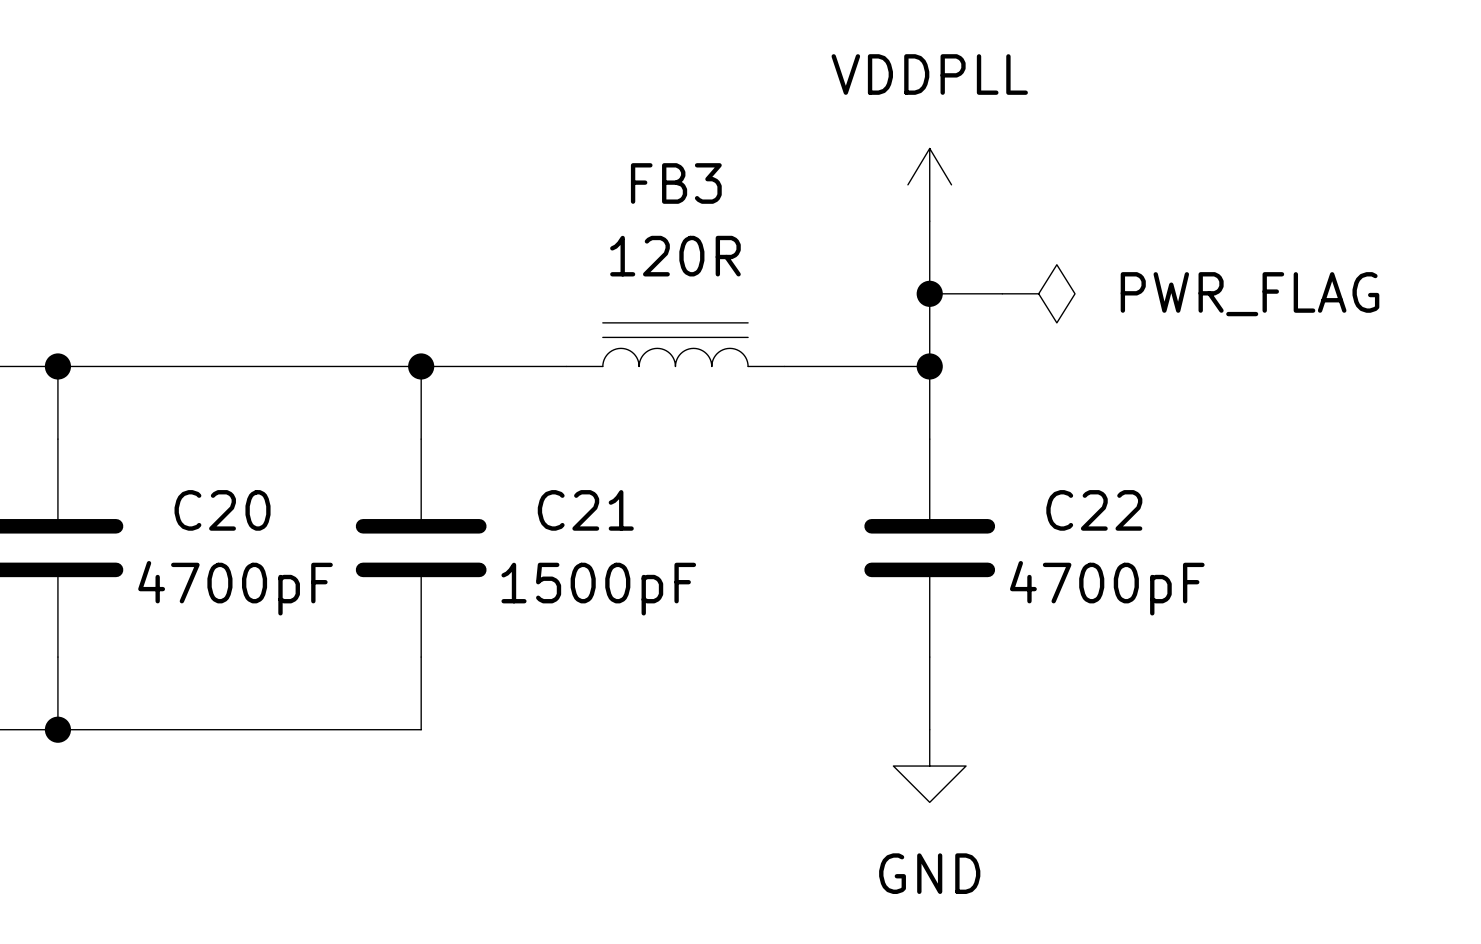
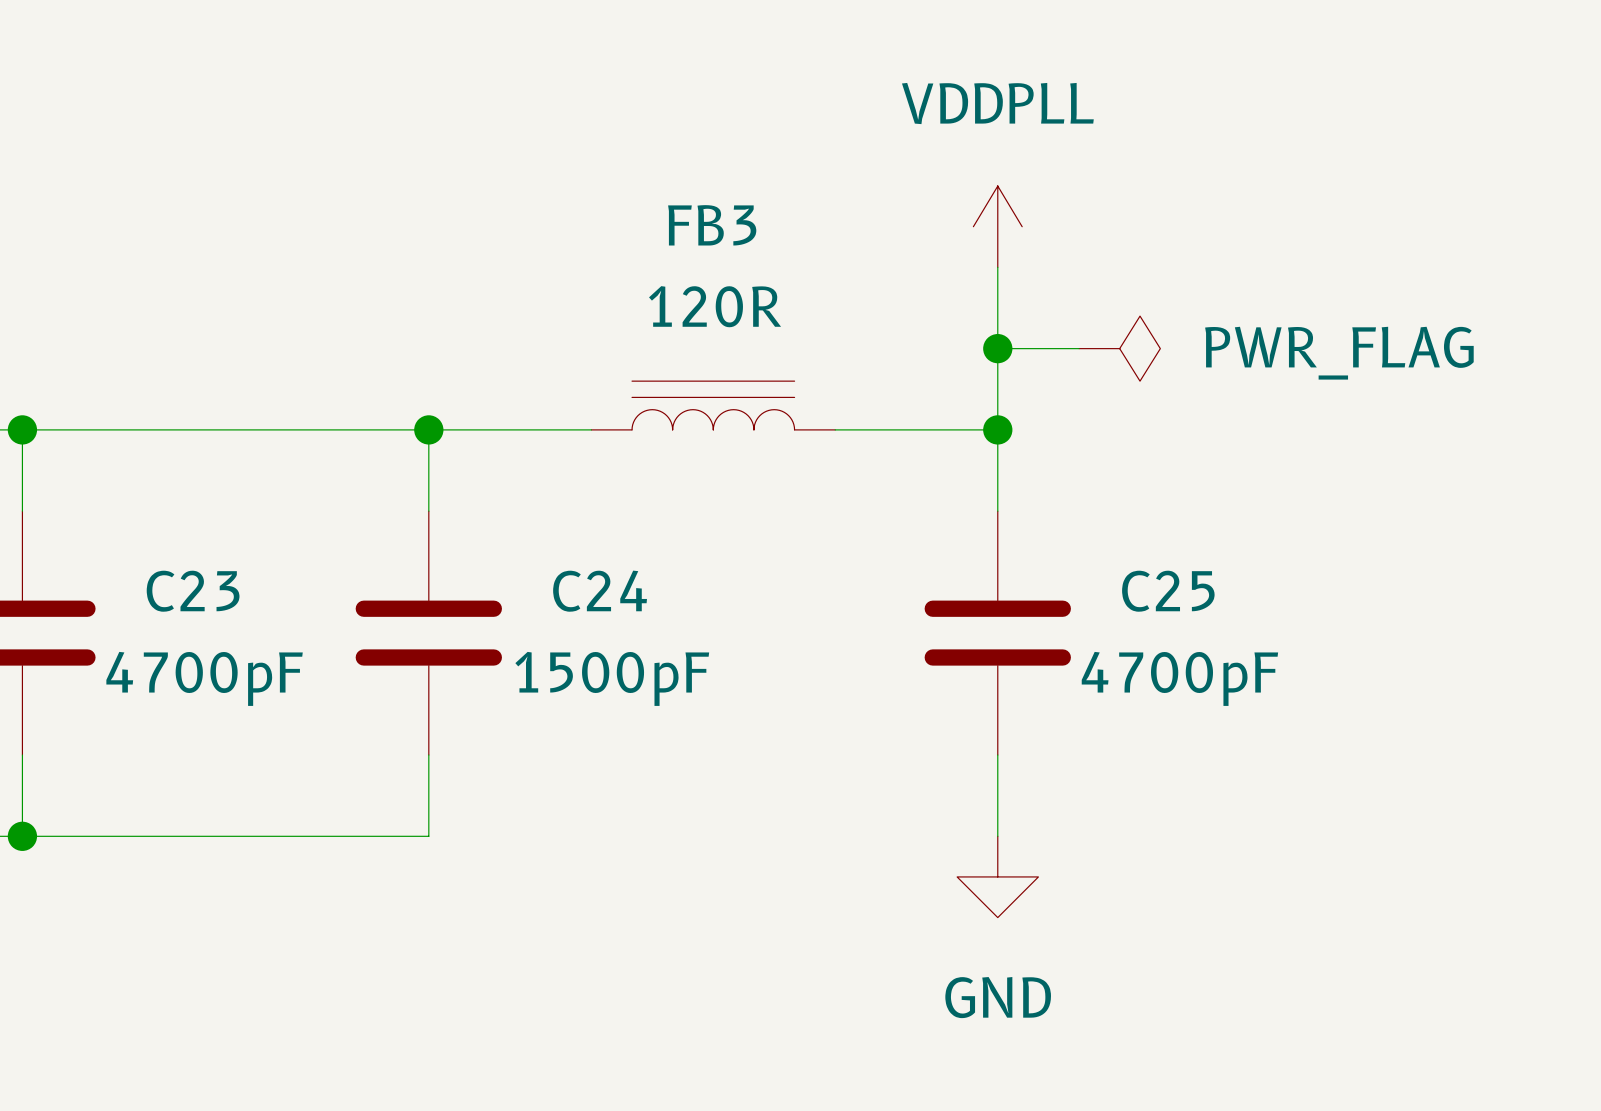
C20 name: C20 (222, 510) -> C23 (193, 591)
C21 name: C21 (585, 510) -> C24 (600, 591)
C22 name: C22 (1094, 510) -> C25 (1168, 591)

